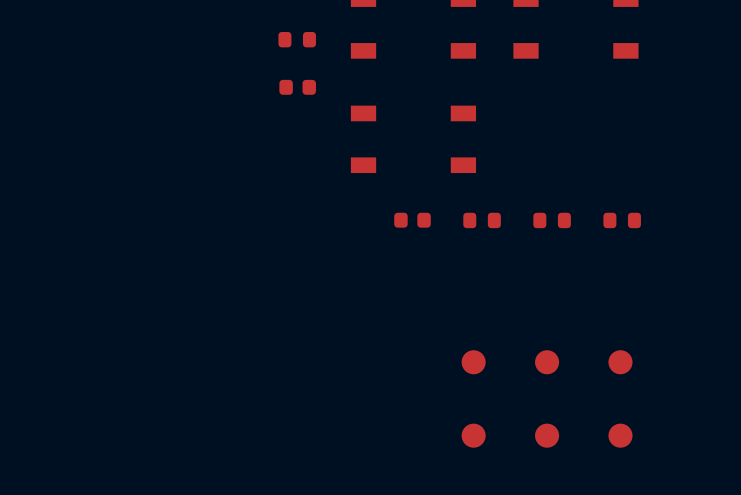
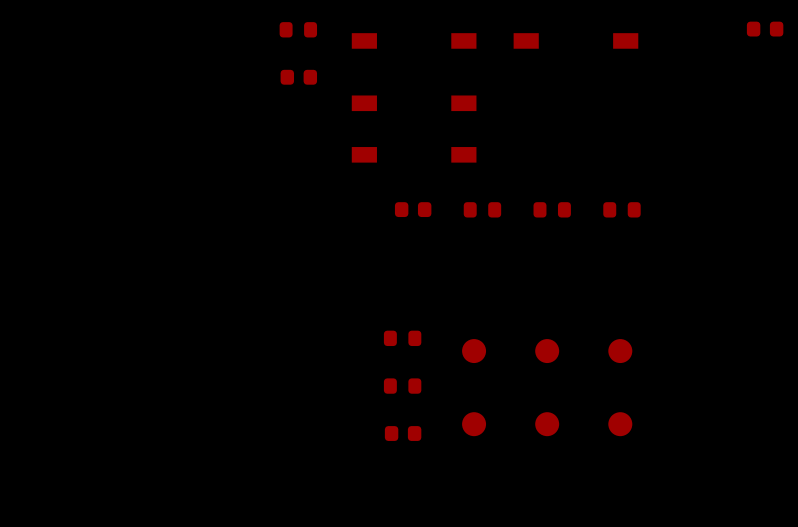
part: none -> (402, 338)
part: none -> (402, 386)
part: none -> (403, 433)

